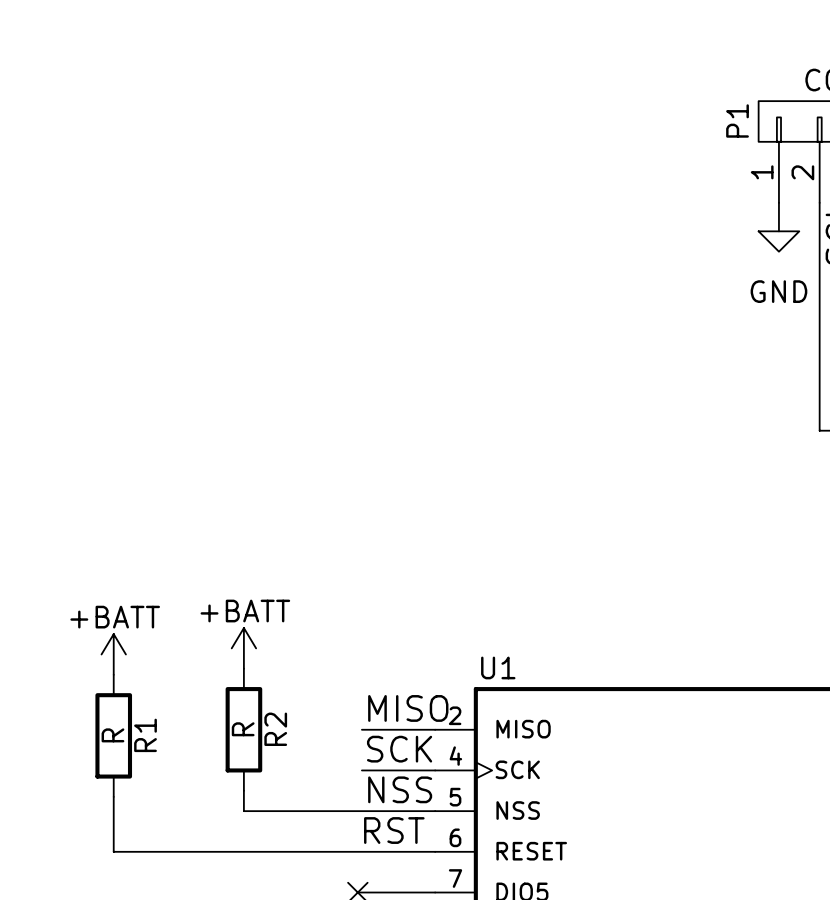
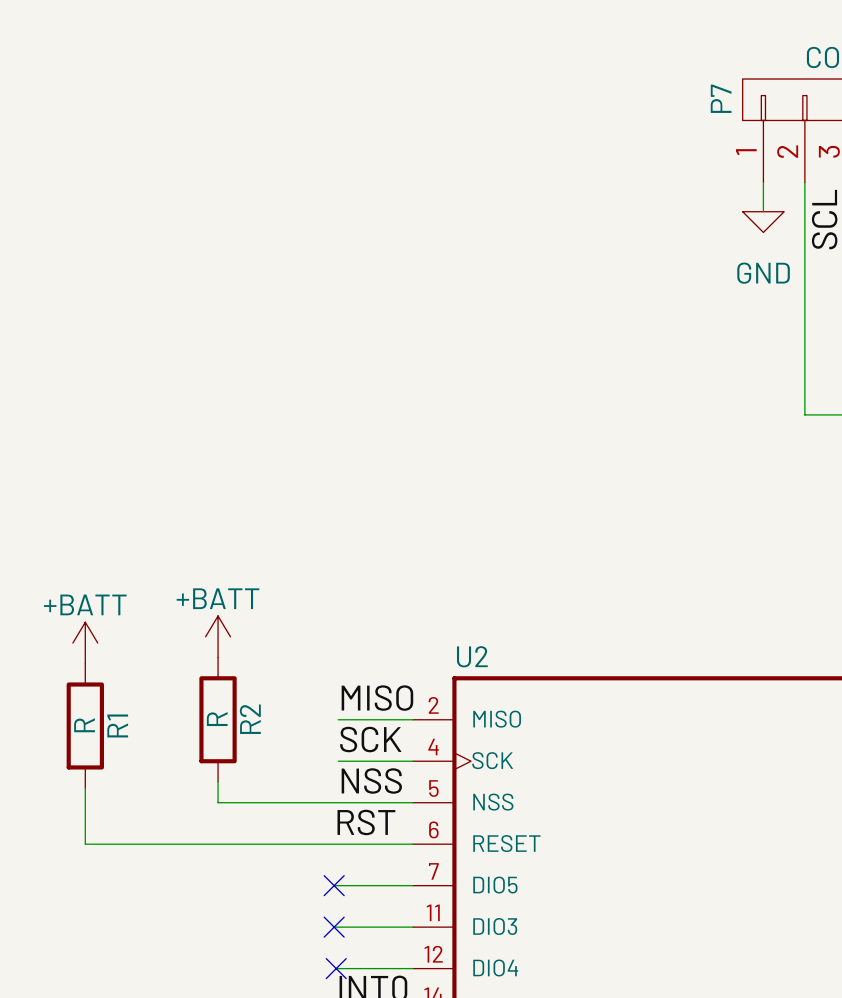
P1 name: P1 (737, 120) -> P7 (721, 98)
U1 name: U1 (498, 667) -> U2 (472, 656)

